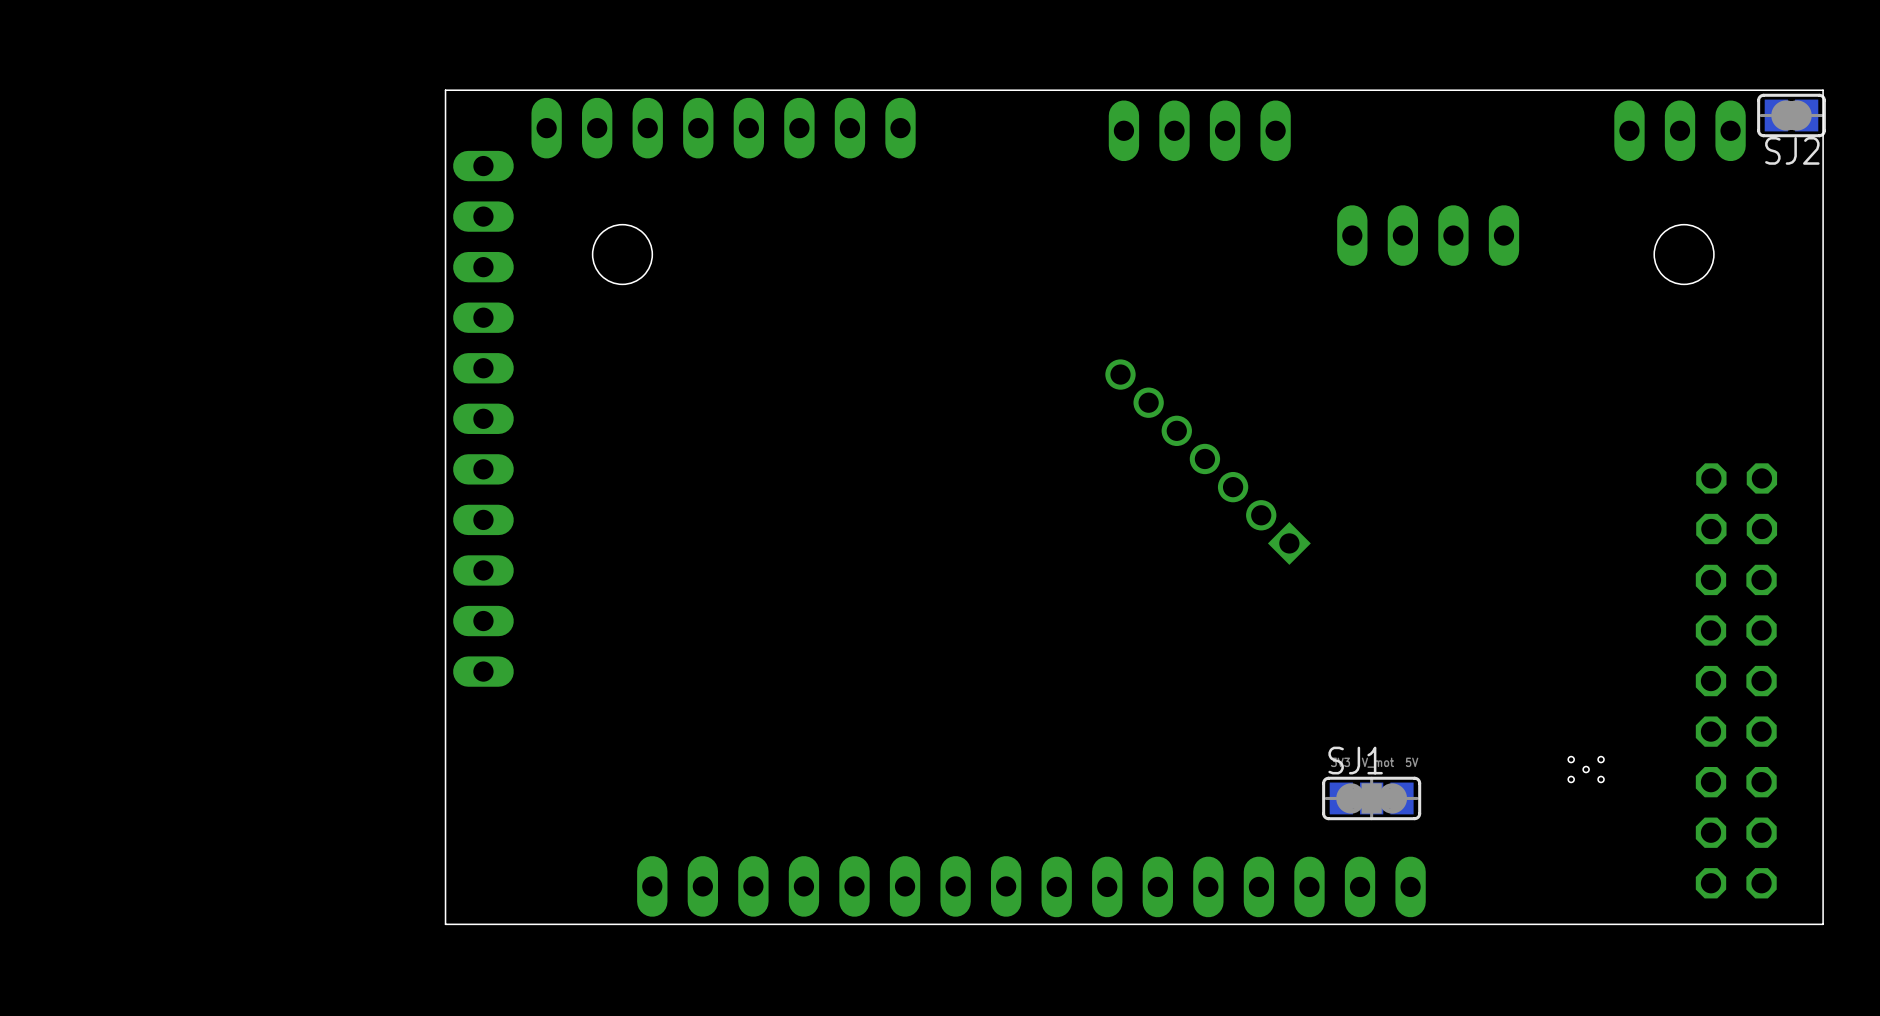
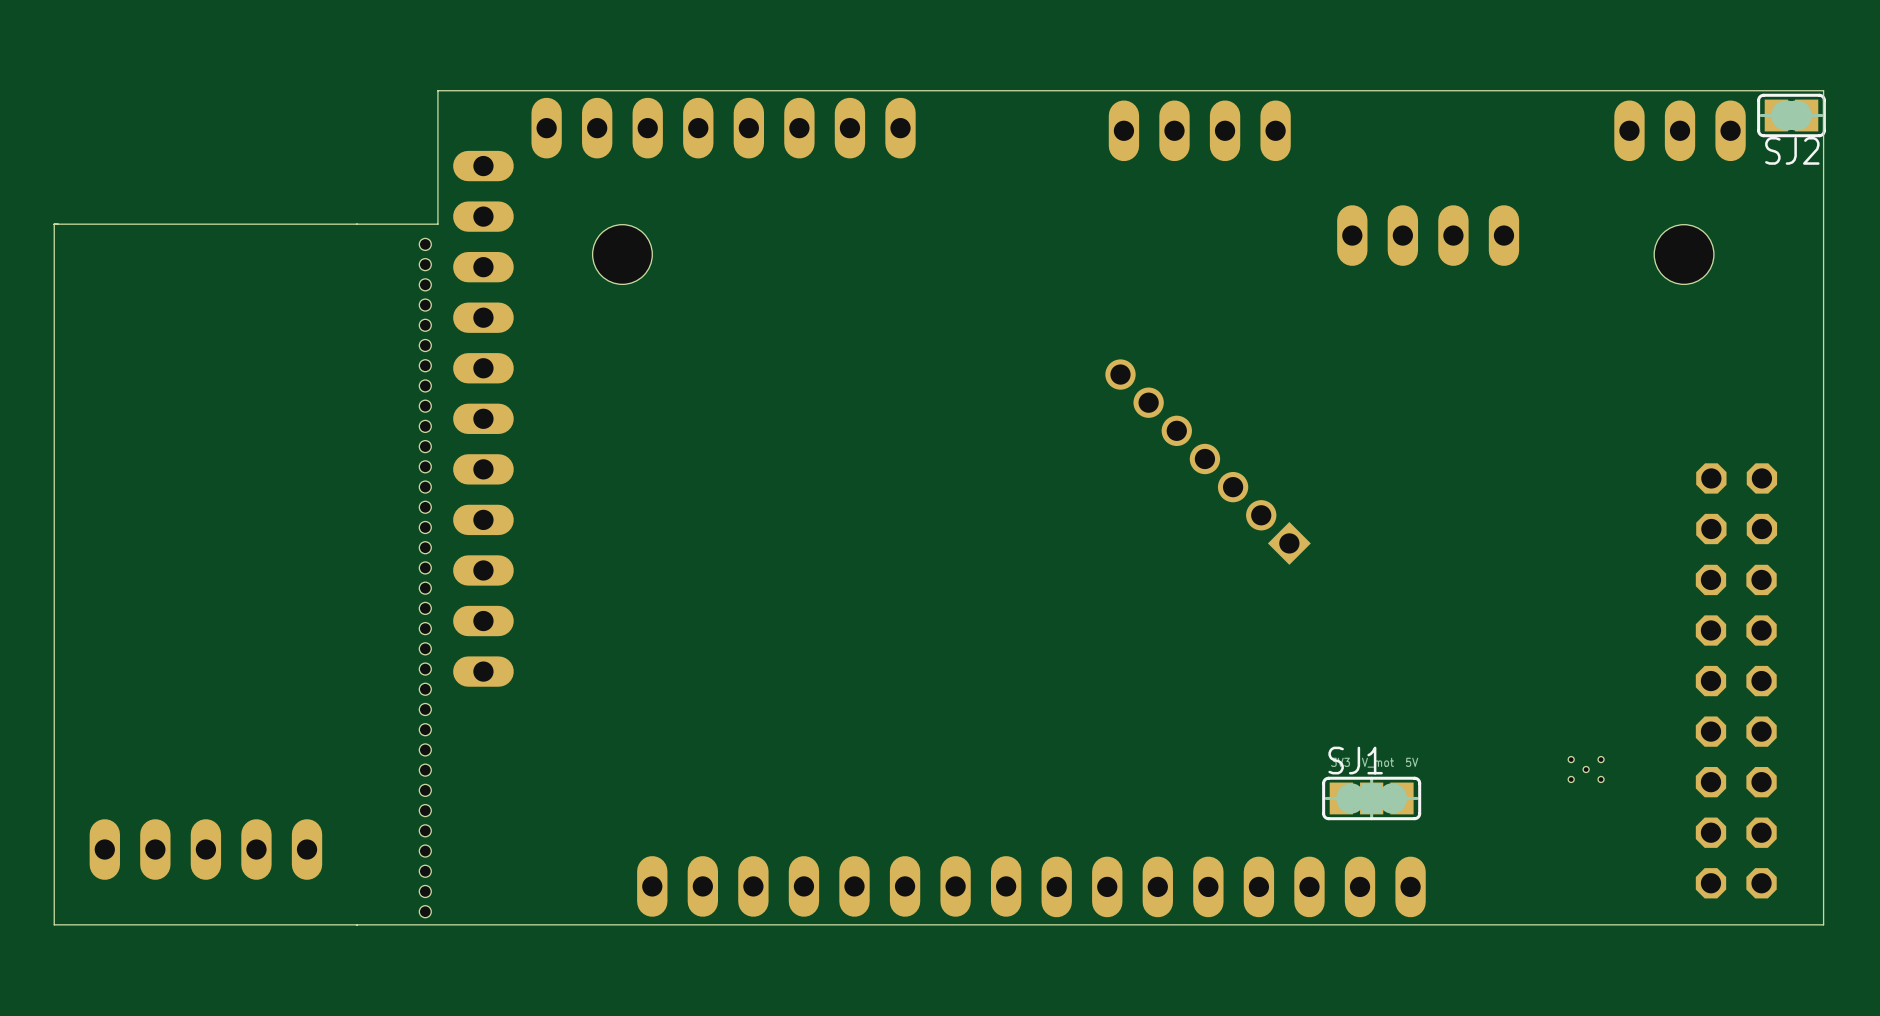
board edge: (1823, 90) (445, 90) (445, 924) (1823, 924) (1823, 90) -> (1823, 90) (1823, 924) (54, 924) (54, 224) (437, 224) (437, 90) (1823, 90)
hole: none -> (425, 244)
hole: none -> (425, 264)
hole: none -> (425, 284)
hole: none -> (425, 305)
hole: none -> (425, 325)
hole: none -> (425, 345)
hole: none -> (425, 365)
hole: none -> (425, 385)
hole: none -> (425, 406)
hole: none -> (425, 426)
hole: none -> (425, 446)
hole: none -> (425, 466)
hole: none -> (425, 487)
hole: none -> (425, 507)
hole: none -> (425, 527)
hole: none -> (425, 547)
hole: none -> (425, 567)
hole: none -> (425, 588)
hole: none -> (425, 608)
hole: none -> (425, 628)
hole: none -> (425, 648)
hole: none -> (425, 669)
hole: none -> (425, 689)
hole: none -> (425, 709)
hole: none -> (425, 729)
hole: none -> (425, 749)
hole: none -> (425, 770)
hole: none -> (425, 790)
hole: none -> (425, 810)
hole: none -> (425, 830)
part: none -> (205, 849)
hole: none -> (425, 851)
hole: none -> (425, 871)
hole: none -> (425, 891)
hole: none -> (425, 911)
board edge: none -> (357, 925) (356, 925)

